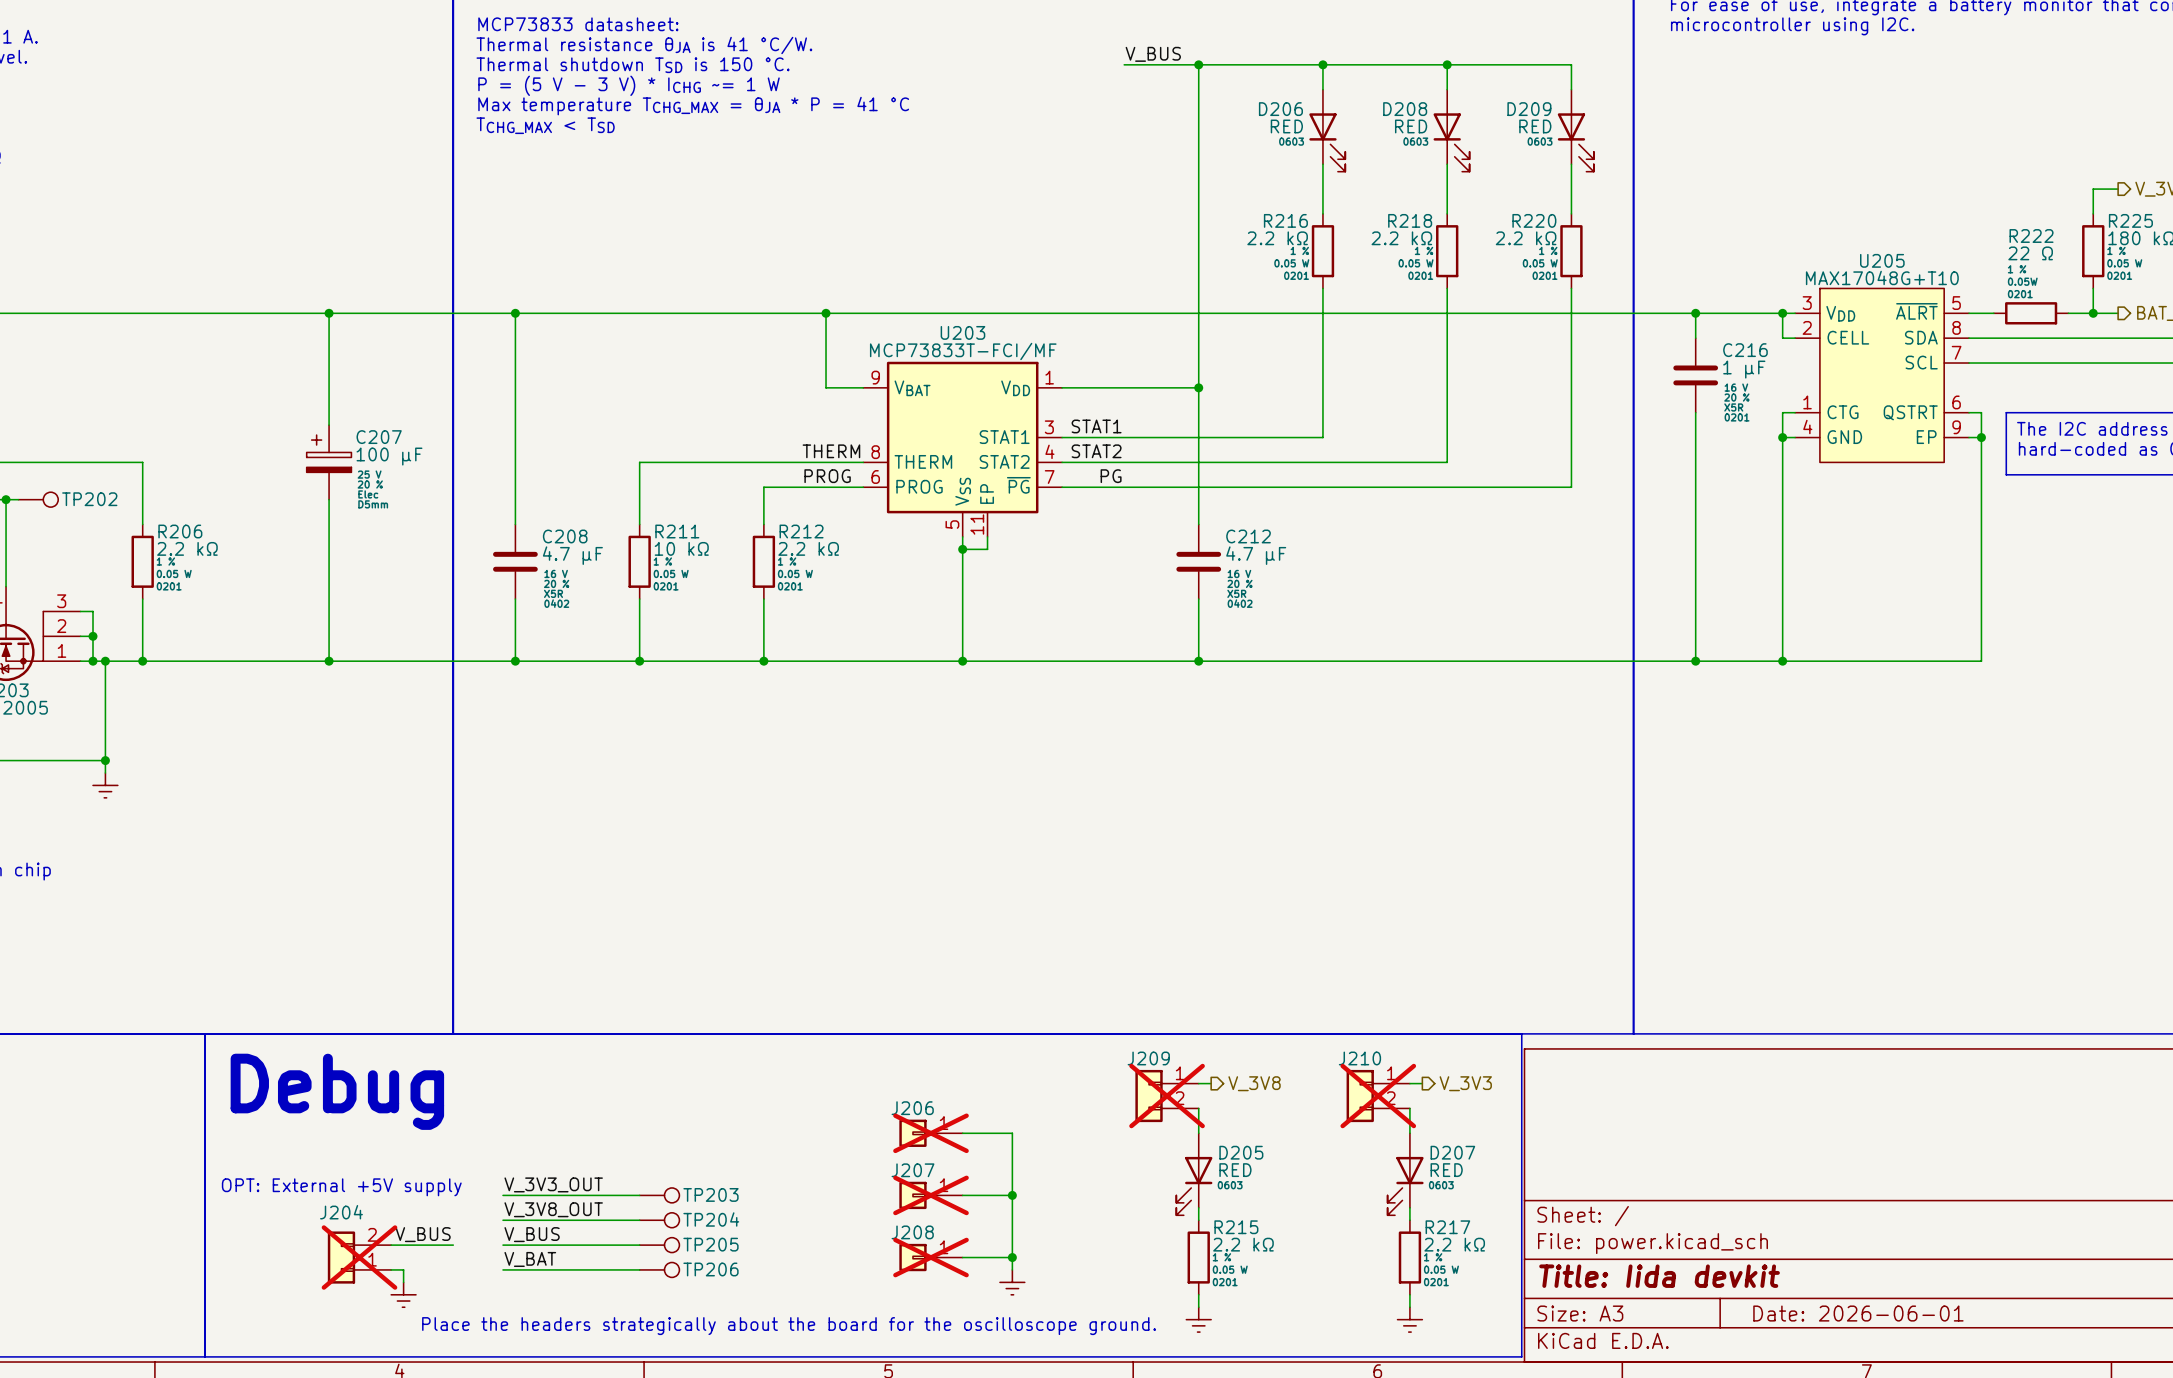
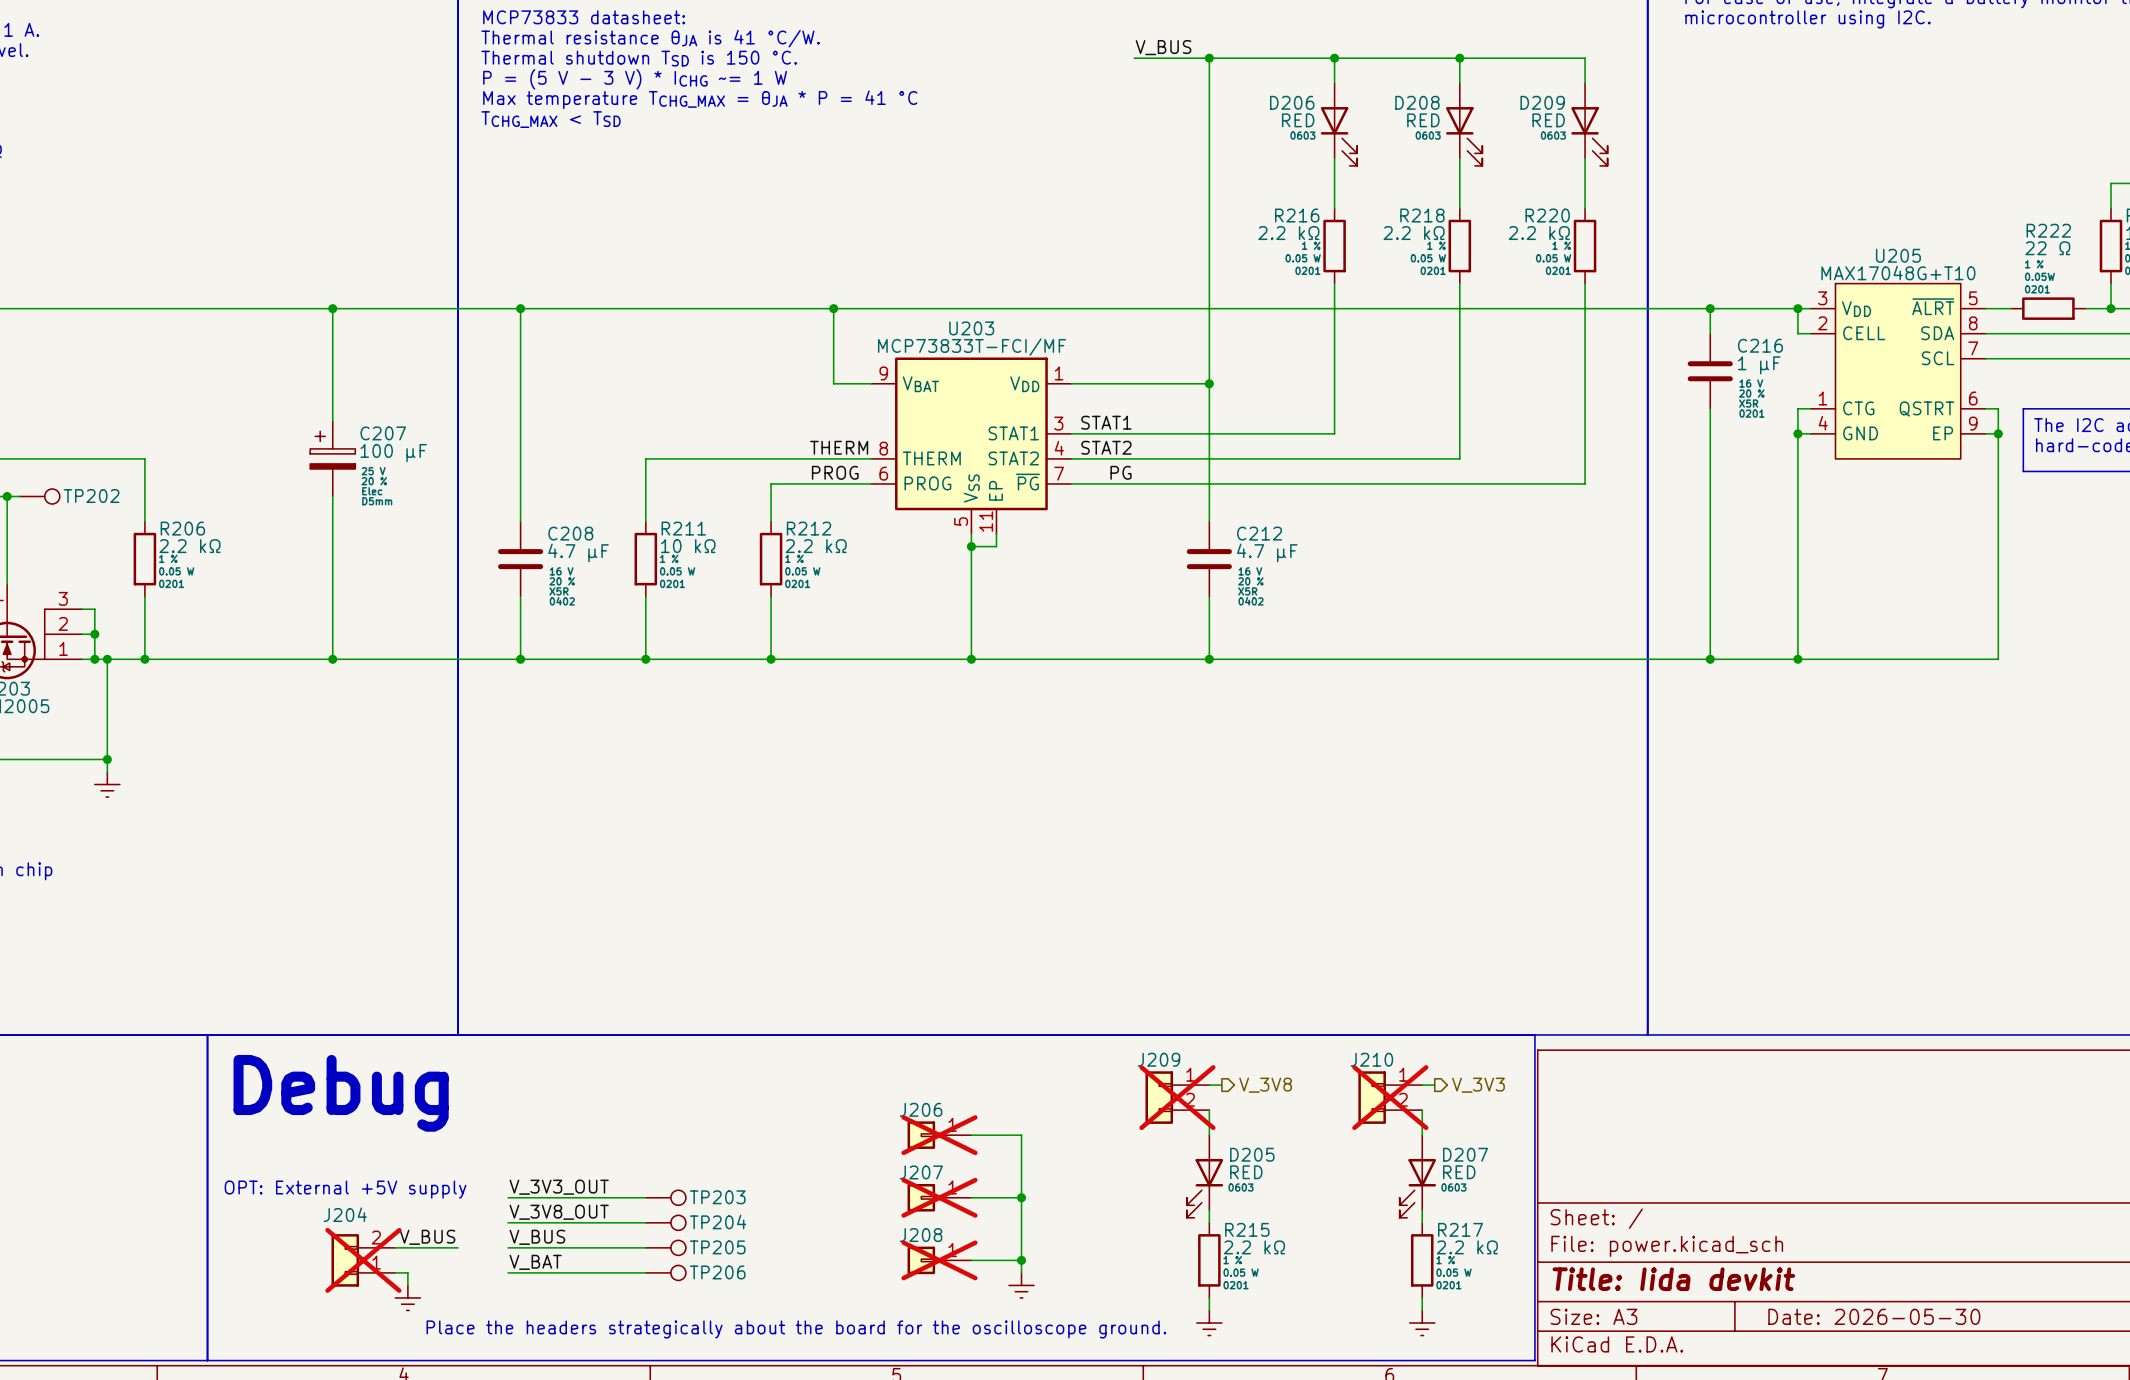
title block: Date: 2026-06-01 (1858, 1313) -> Date: 2026-05-30 (1874, 1316)

